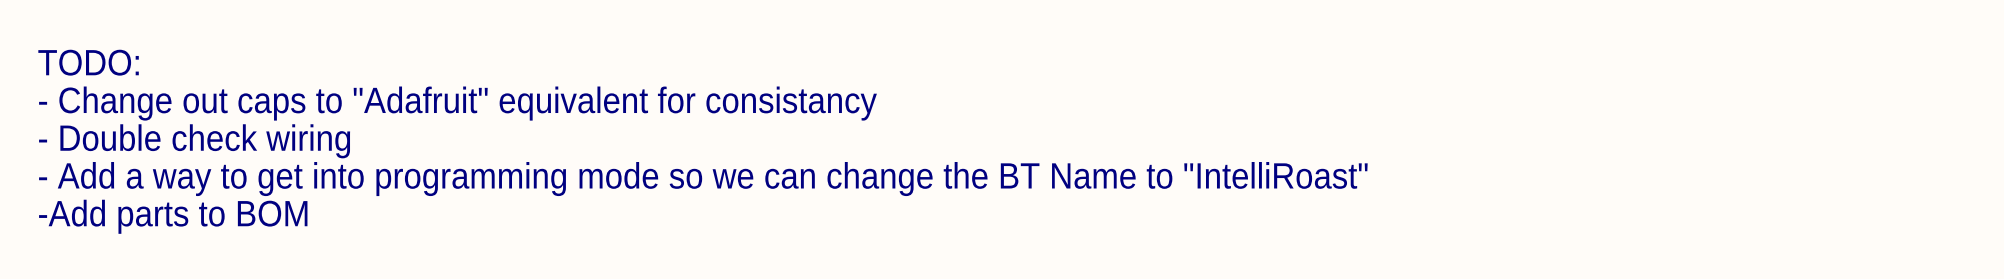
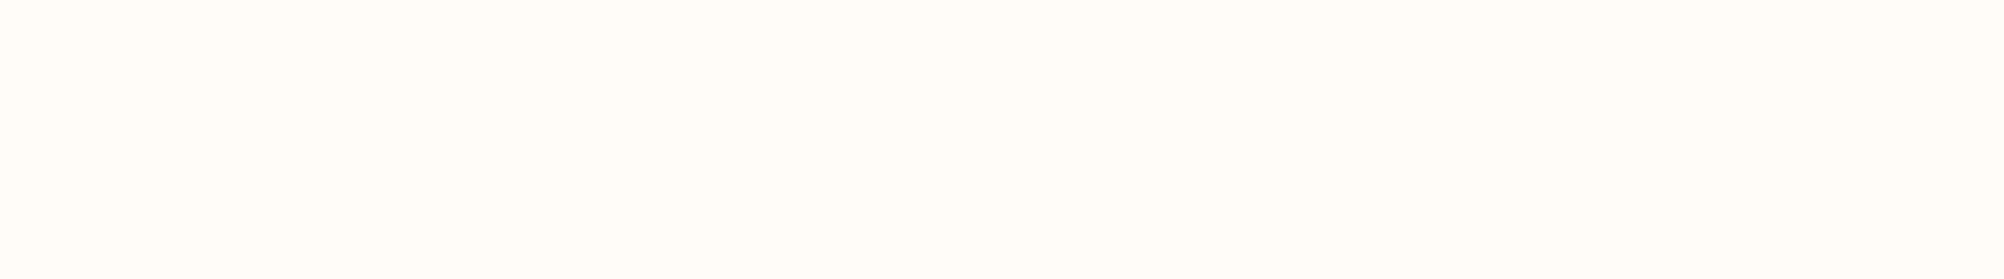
text: TODO: (88, 62) -> none
text: - Change out caps to "Adafruit" equivalent for consistancy (457, 103) -> none
text: - Double check wiring (194, 141) -> none
text: - Add a way to get into programming mode so we can change the BT Name to "IntelliRoast" (703, 179) -> none
text: -Add parts to BOM (173, 216) -> none

